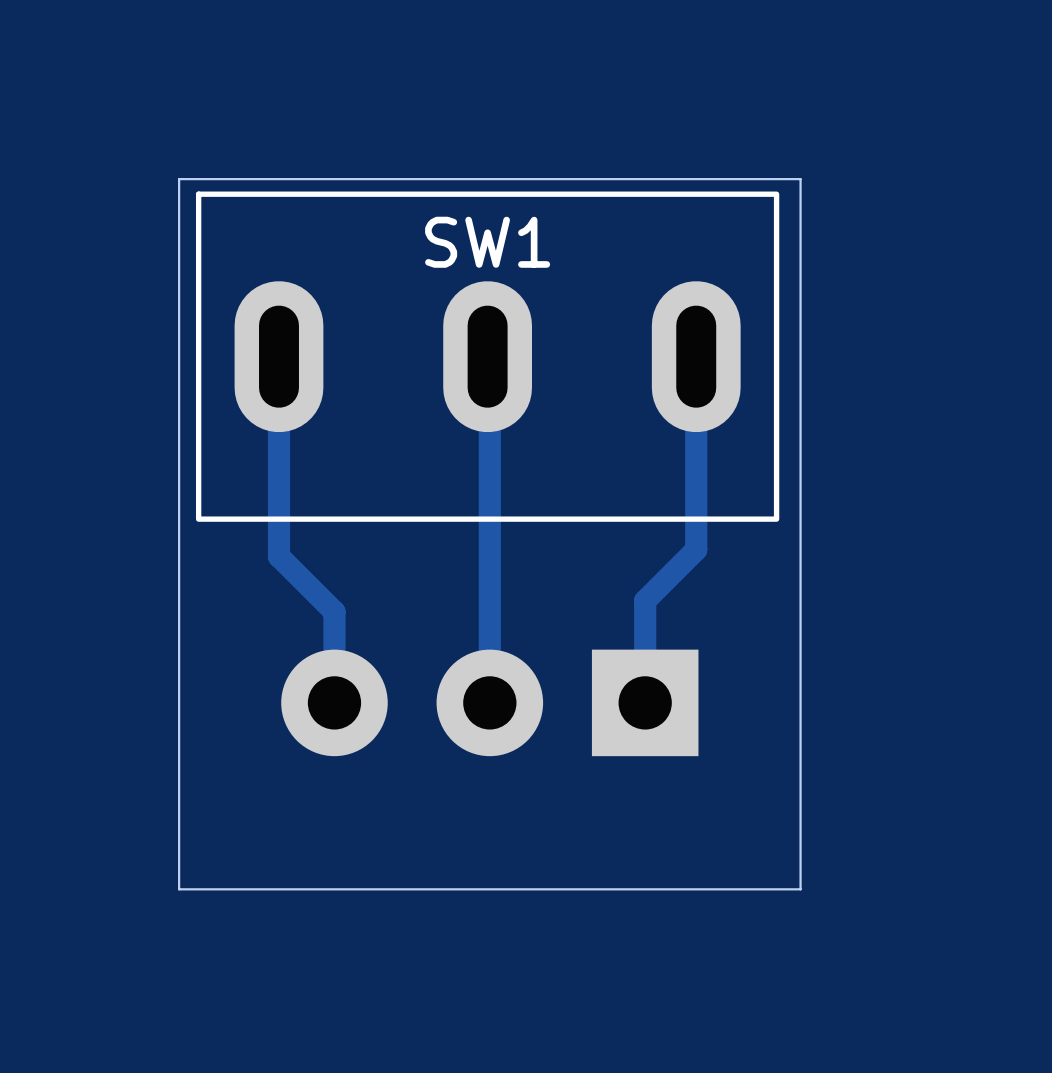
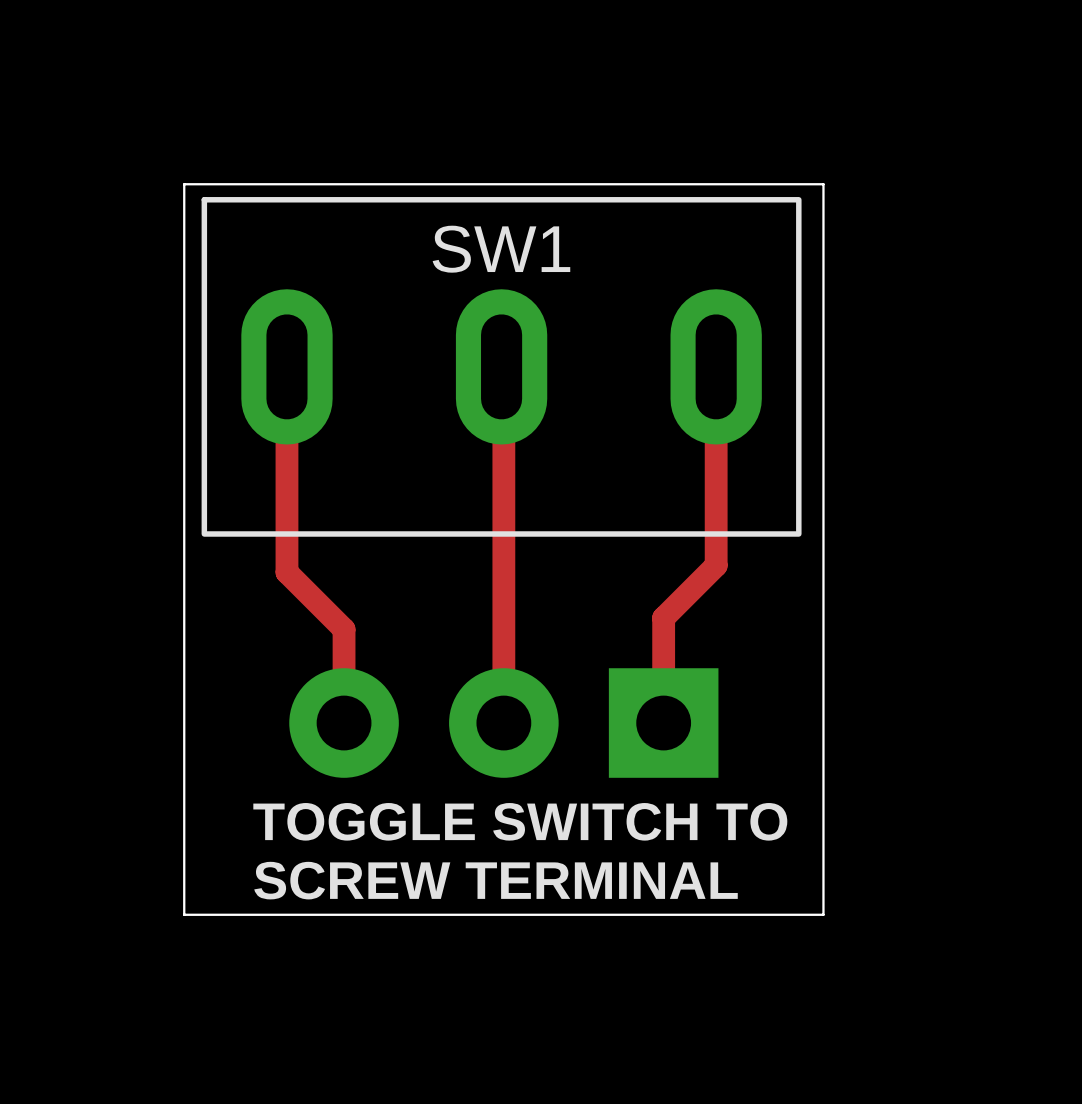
text: none -> TOGGLE SWITCH TO (520, 821)
text: none -> SCREW TERMINAL (496, 880)

